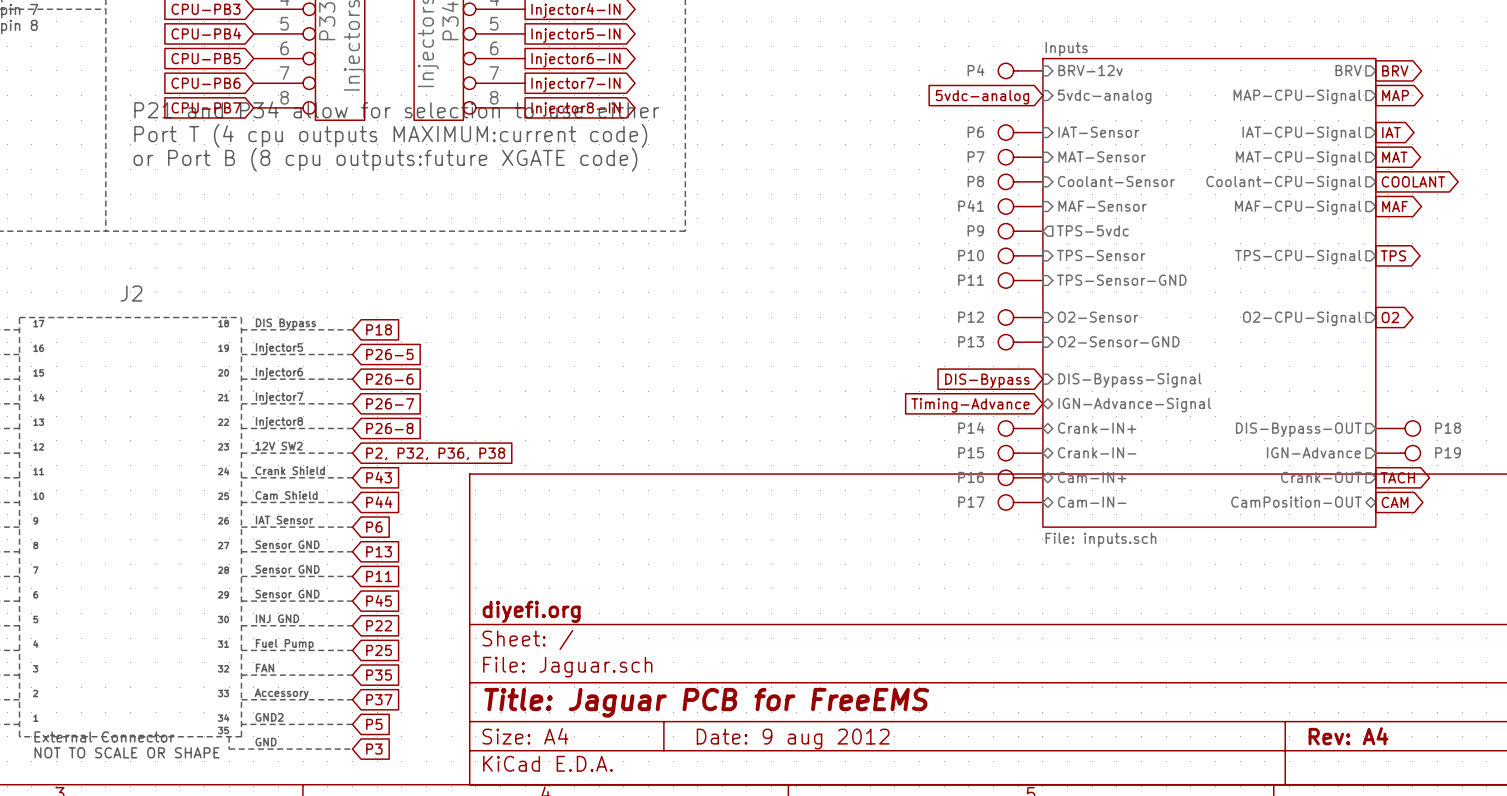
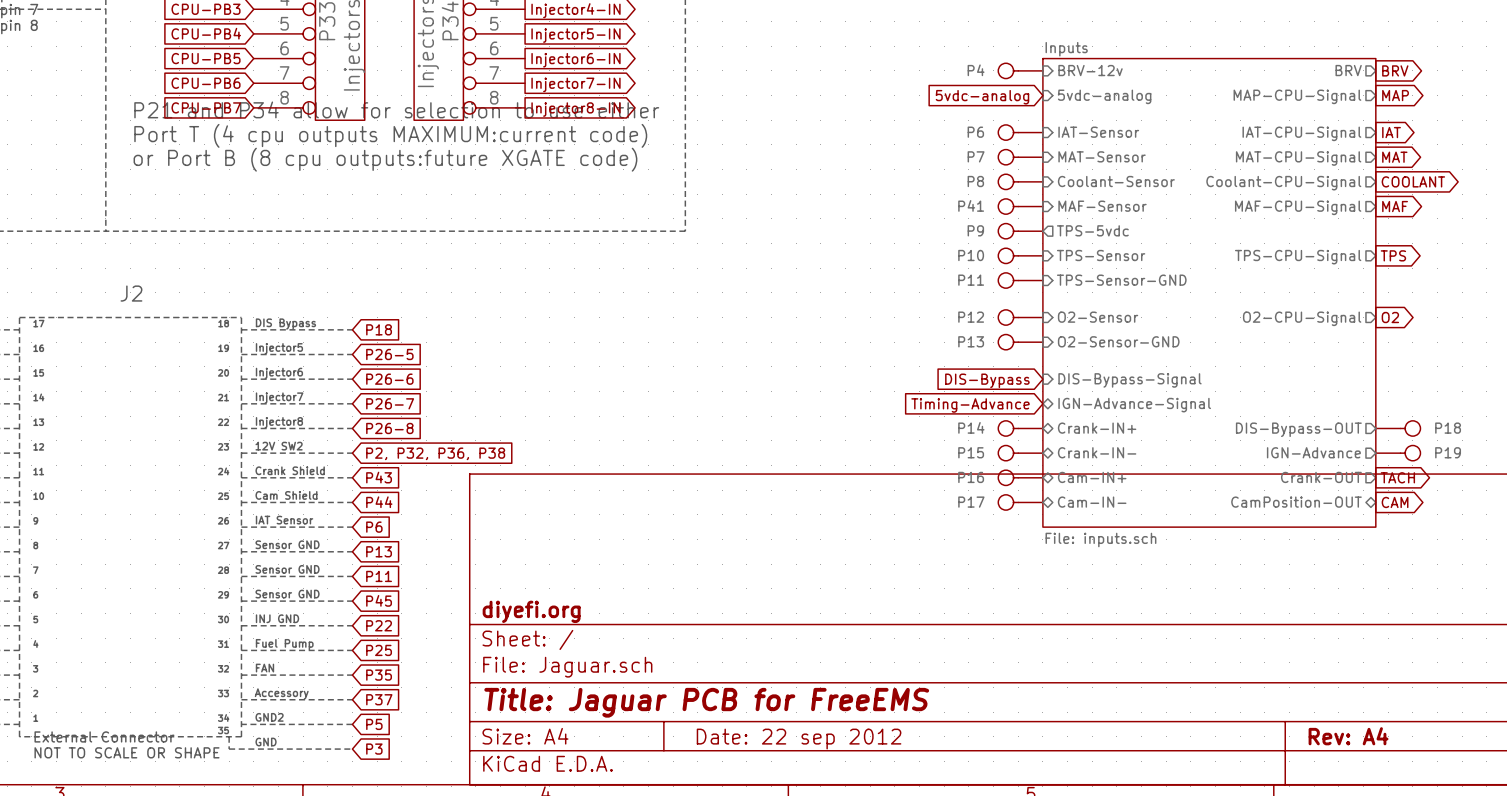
title block: Date: 9 aug 2012 (793, 739) -> Date: 22 sep 2012 (799, 739)

